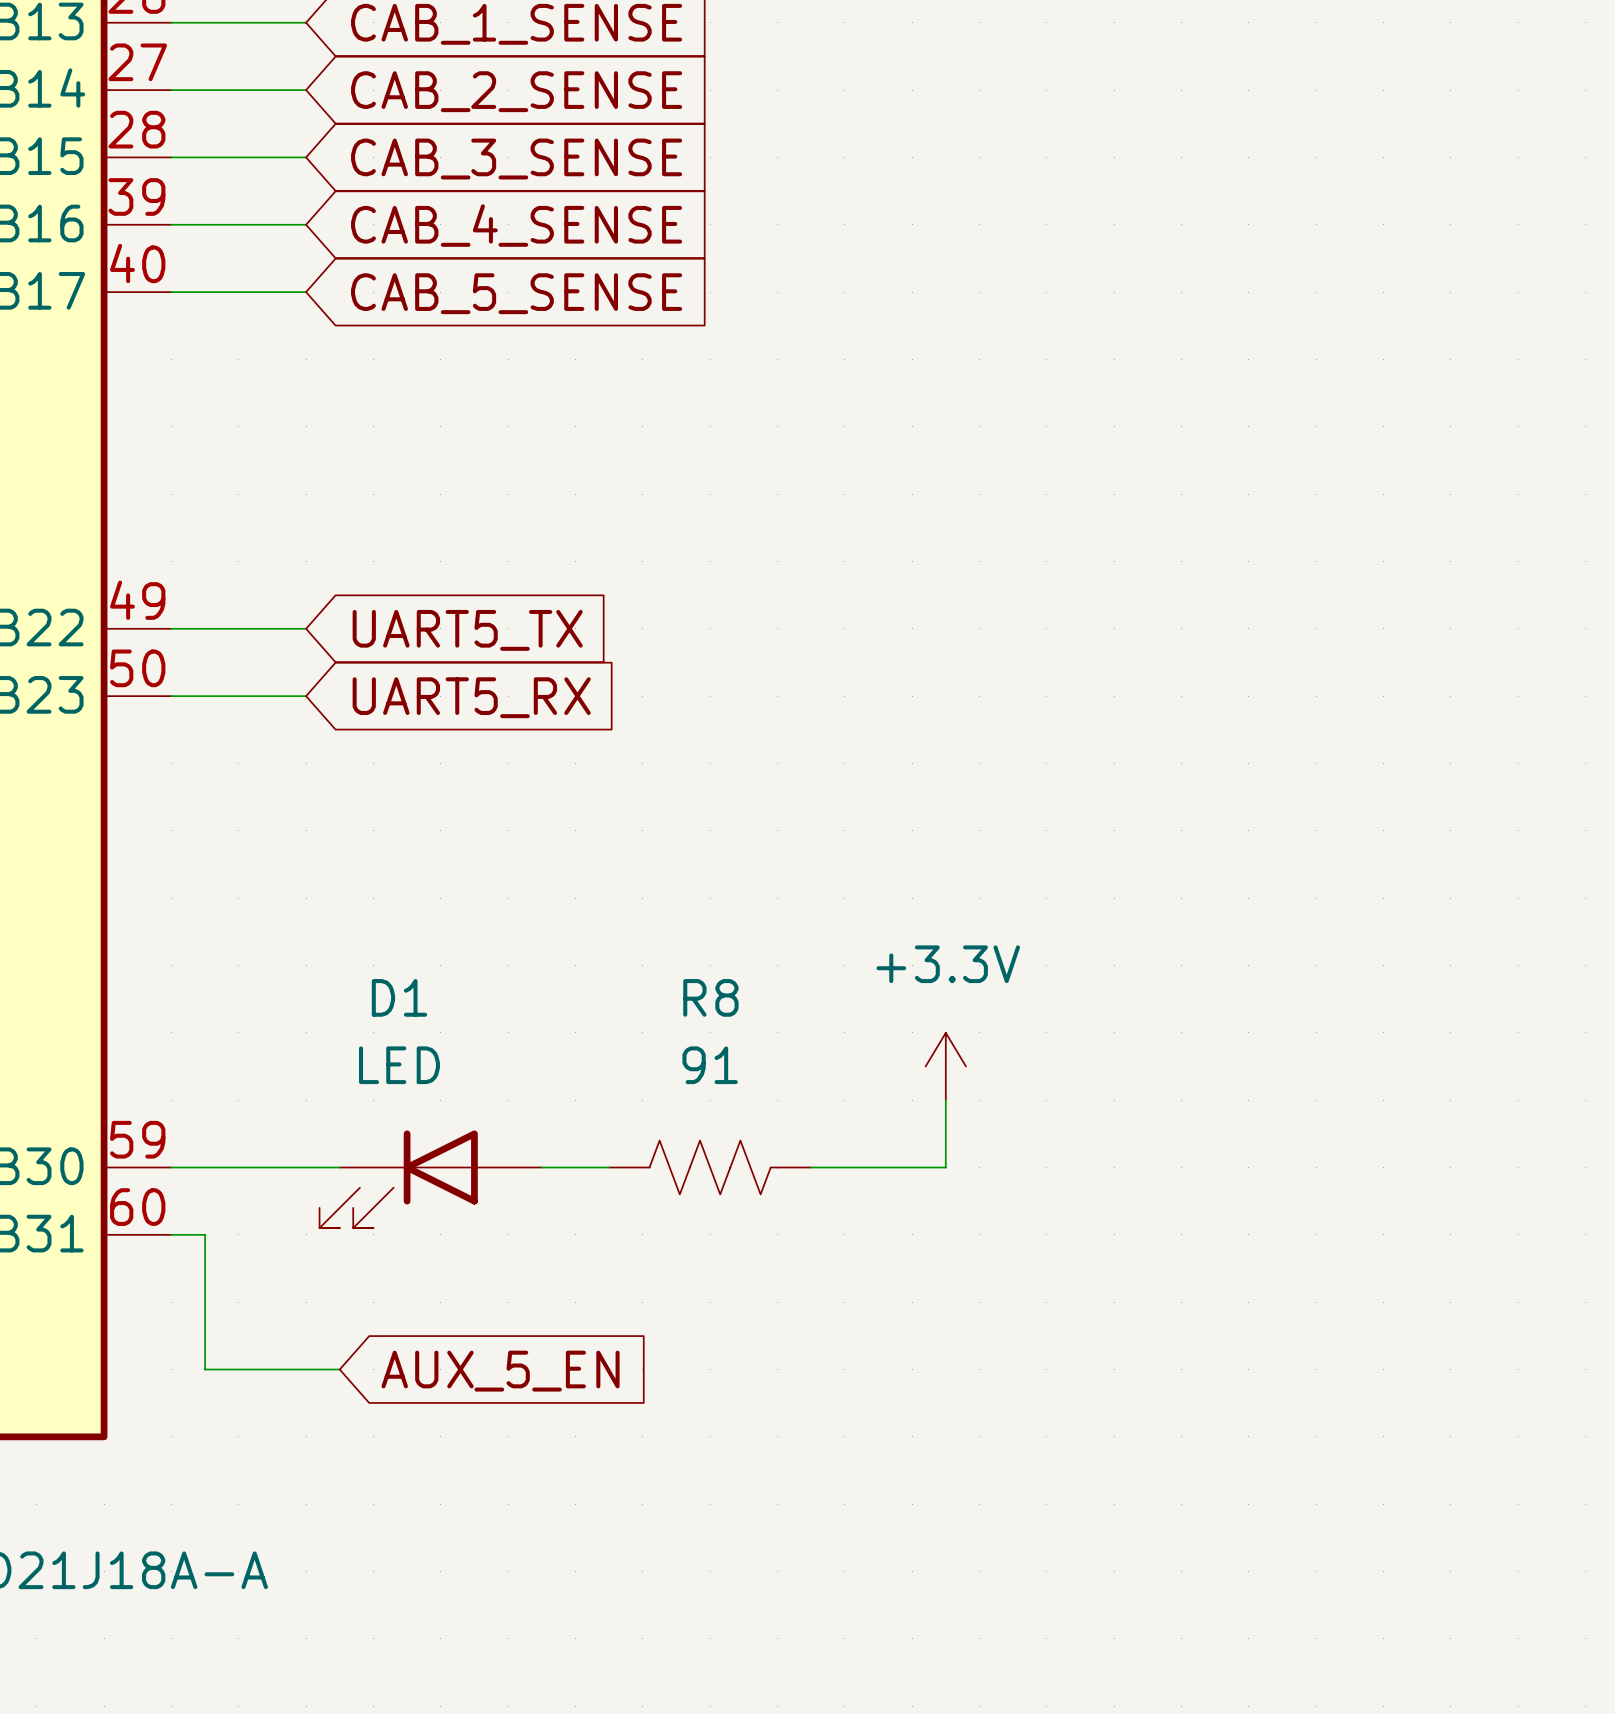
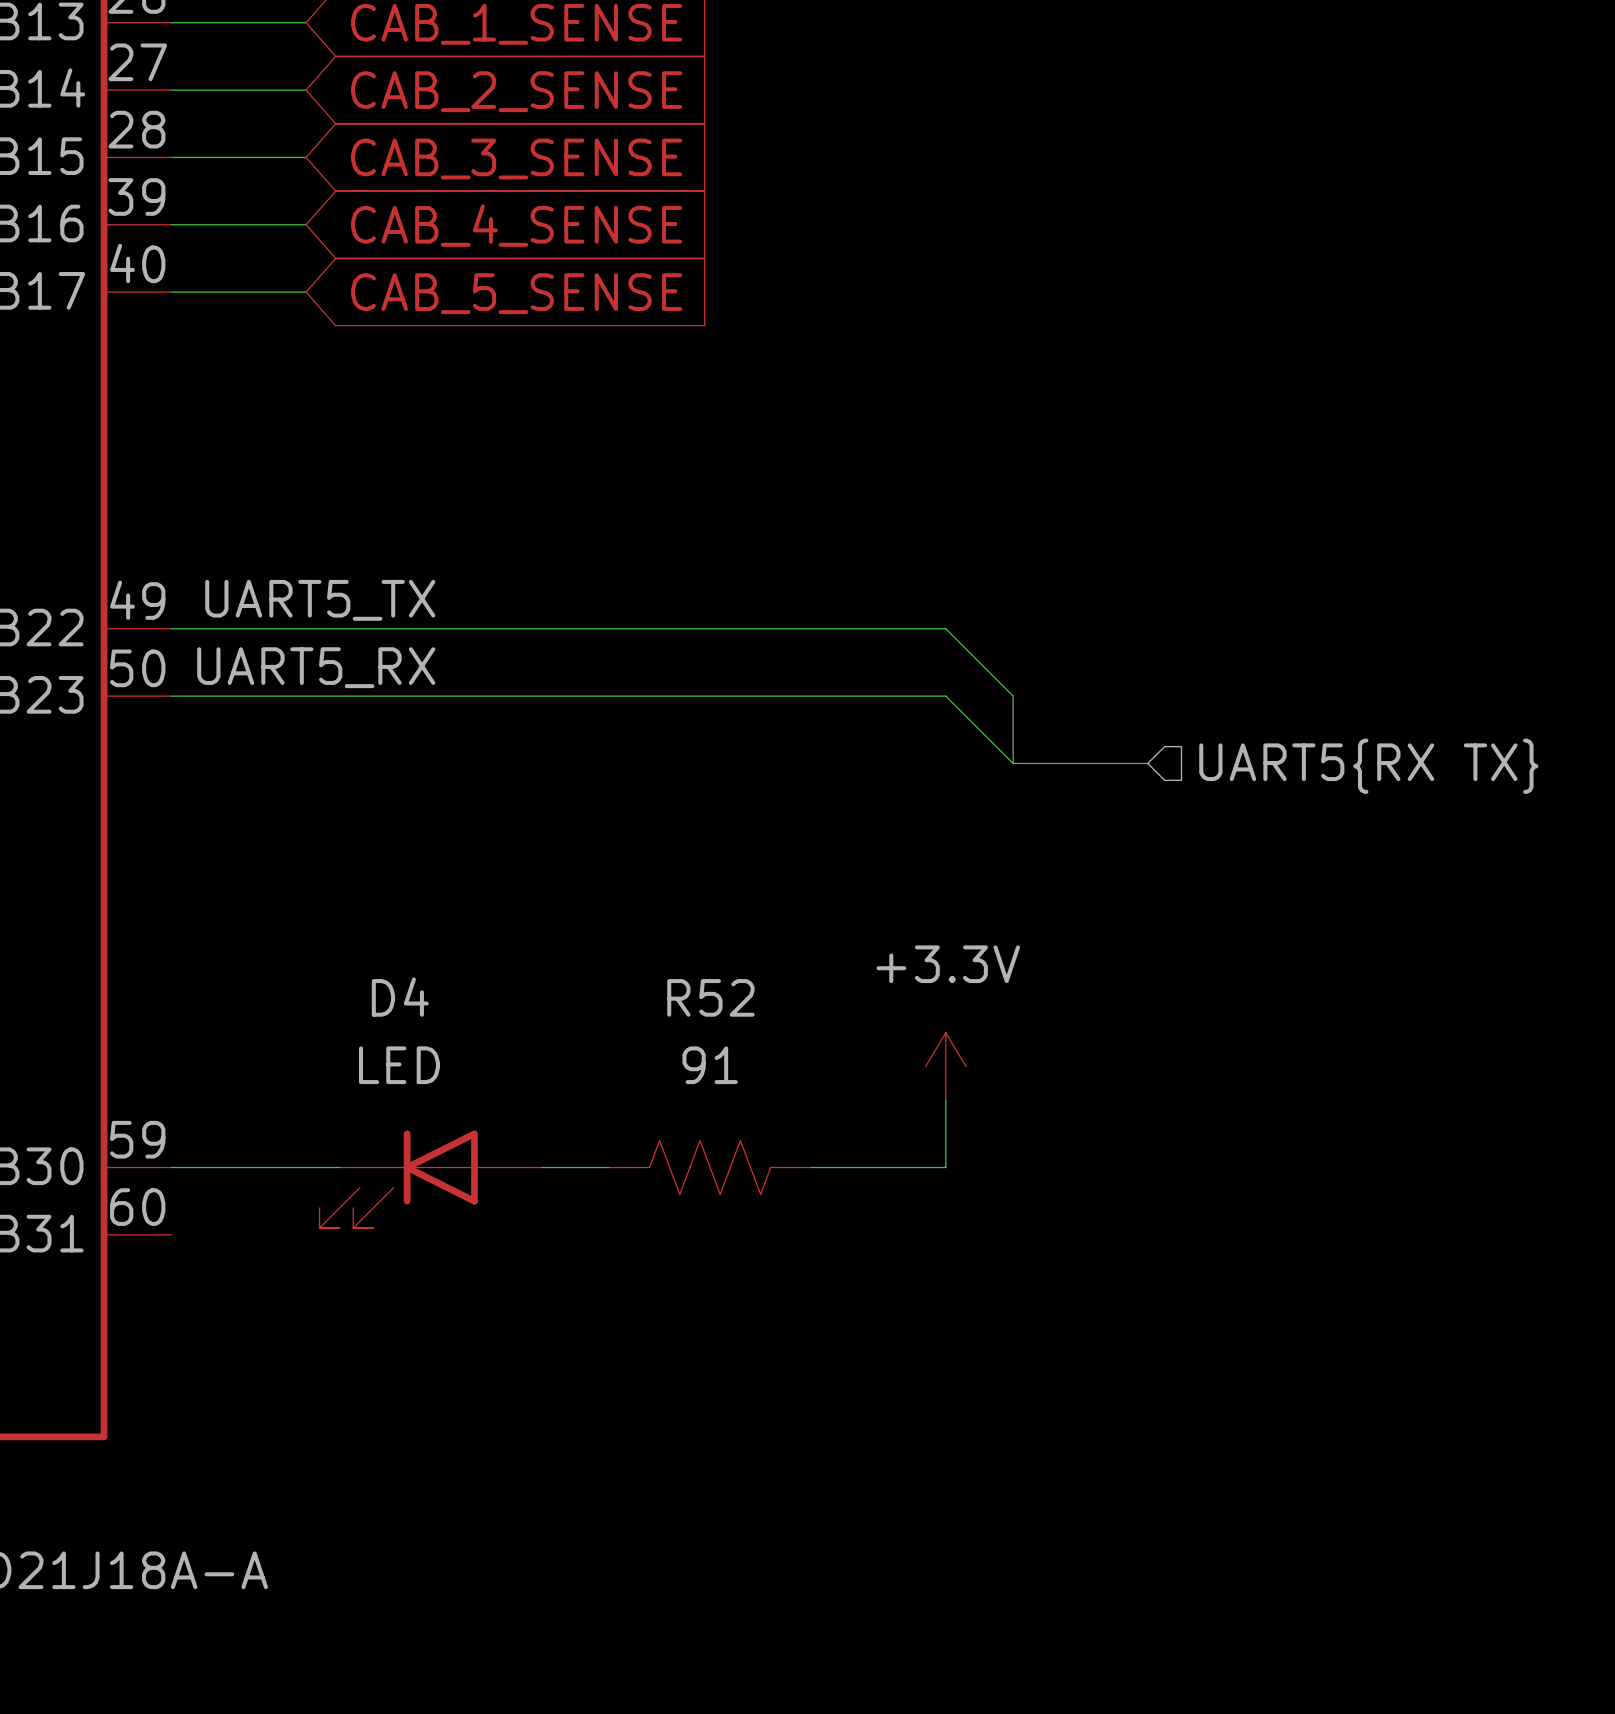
label: none -> UART5_TX (320, 600)
wire: none -> (306, 628) (945, 628) (1013, 696)
global label: UART5_TX (467, 630) -> none
label: none -> UART5_RX (316, 667)
wire: none -> (306, 696) (945, 696) (1013, 763)
bus: none -> (1013, 696) (1013, 763) (1147, 763)
global label: UART5_RX (471, 697) -> none
hierarchical label: none -> UART5{RX TX} (1368, 766)
D1 name: D1 (399, 997) -> D4 (400, 997)
R8 name: R8 (710, 997) -> R52 (710, 997)
wire: (171, 1234) (205, 1234) (205, 1369) (339, 1369) -> none
global label: AUX_5_EN (500, 1371) -> none

